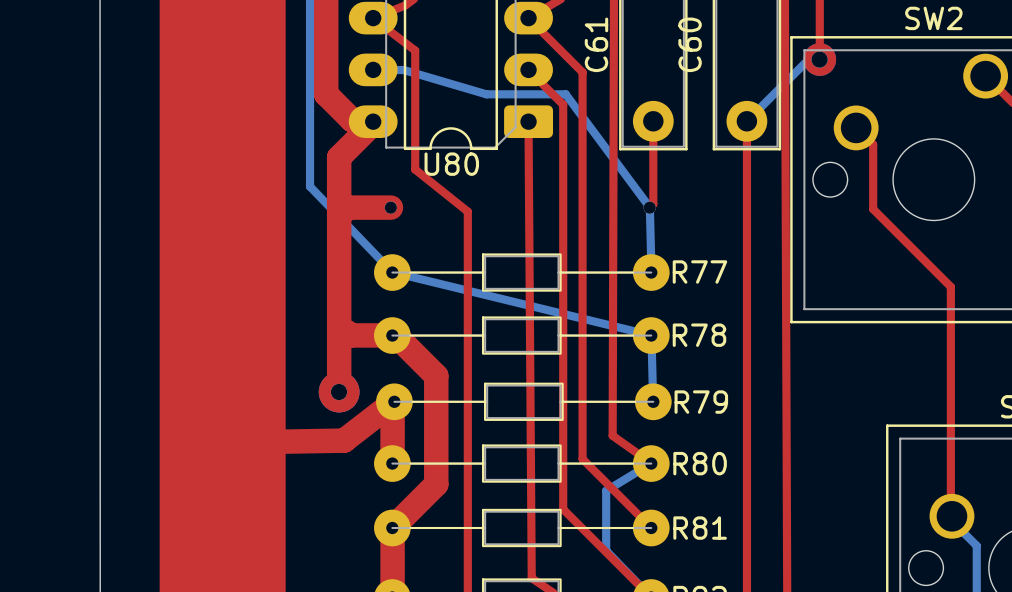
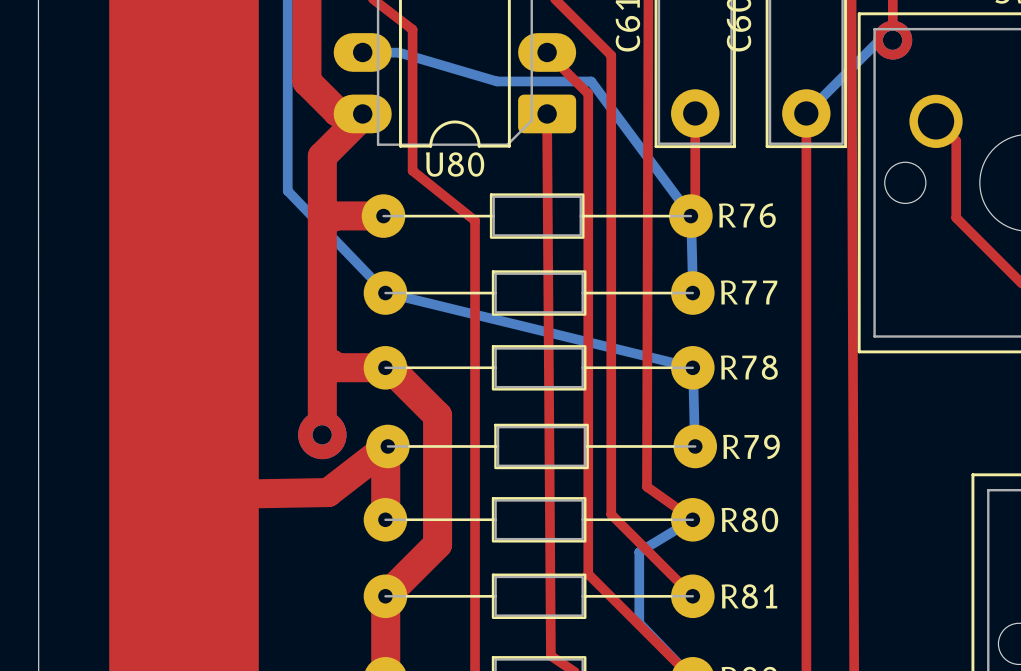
via: (390, 207) -> none
R76: none -> (537, 216)
via: (649, 207) -> none

